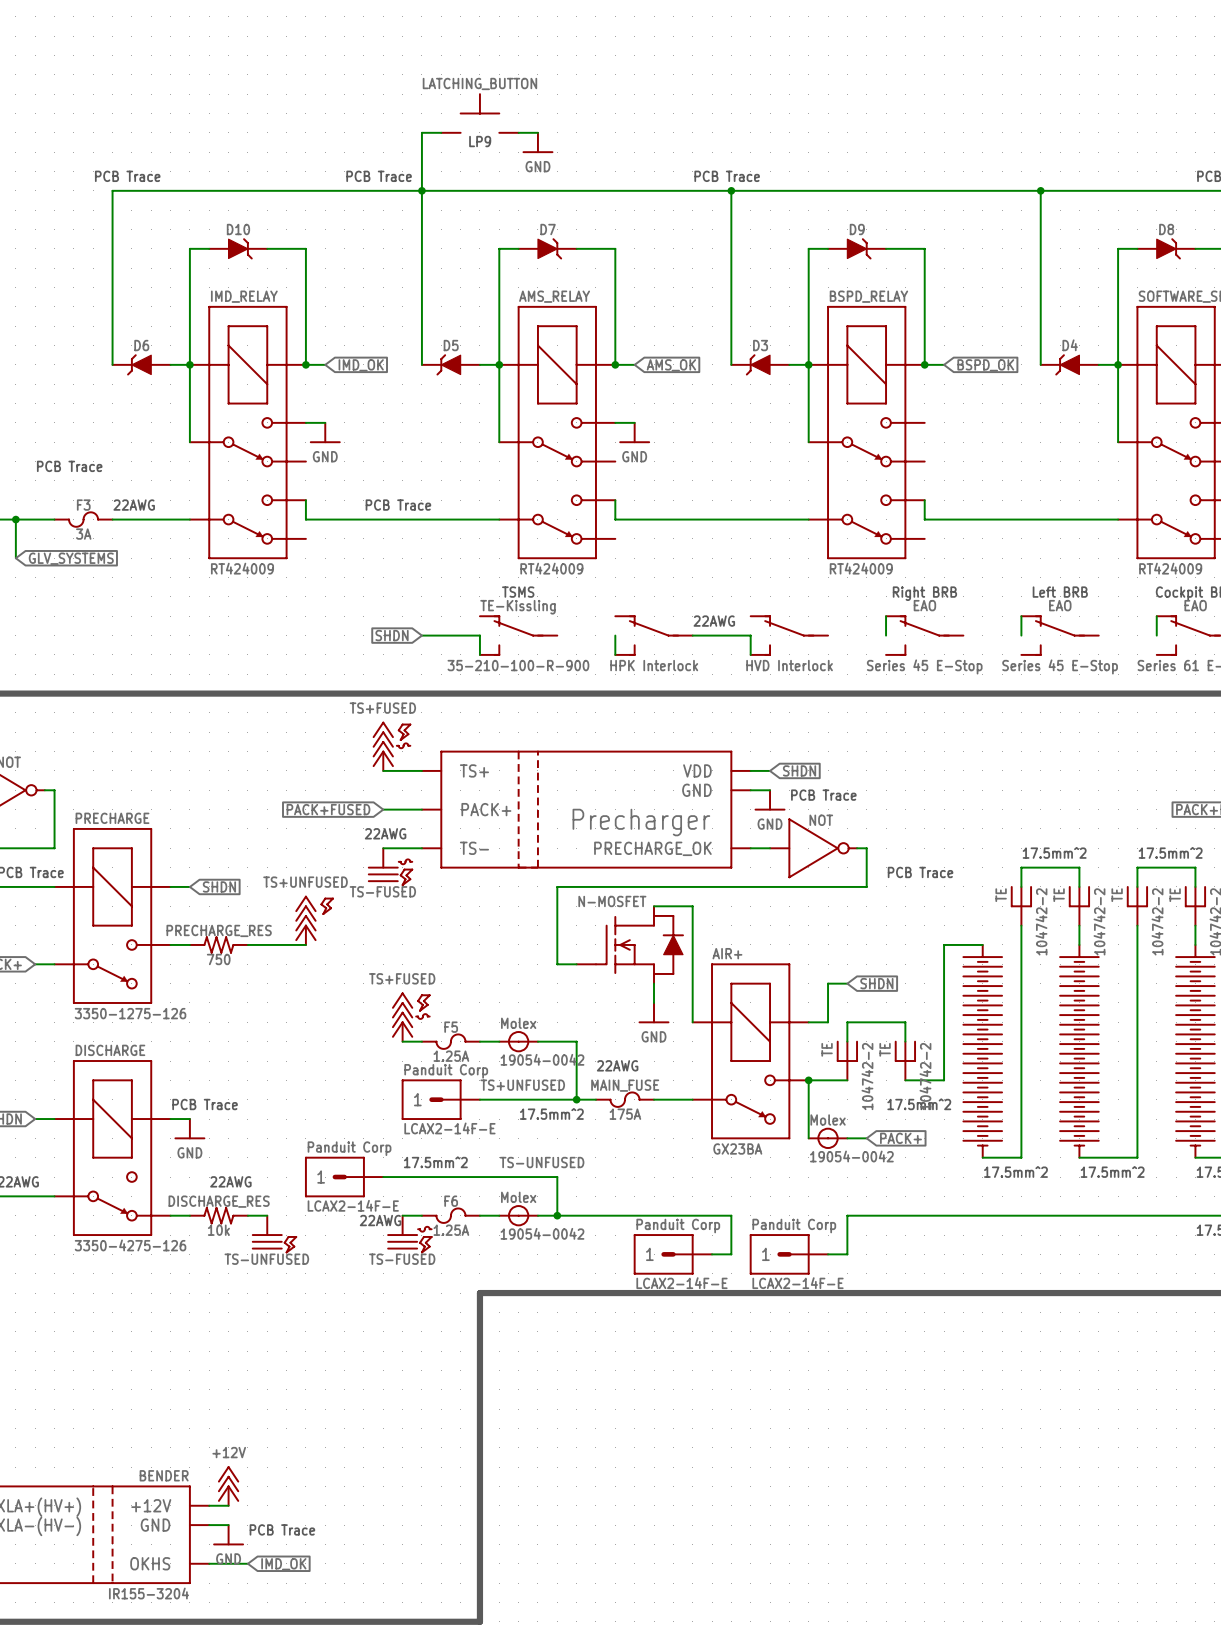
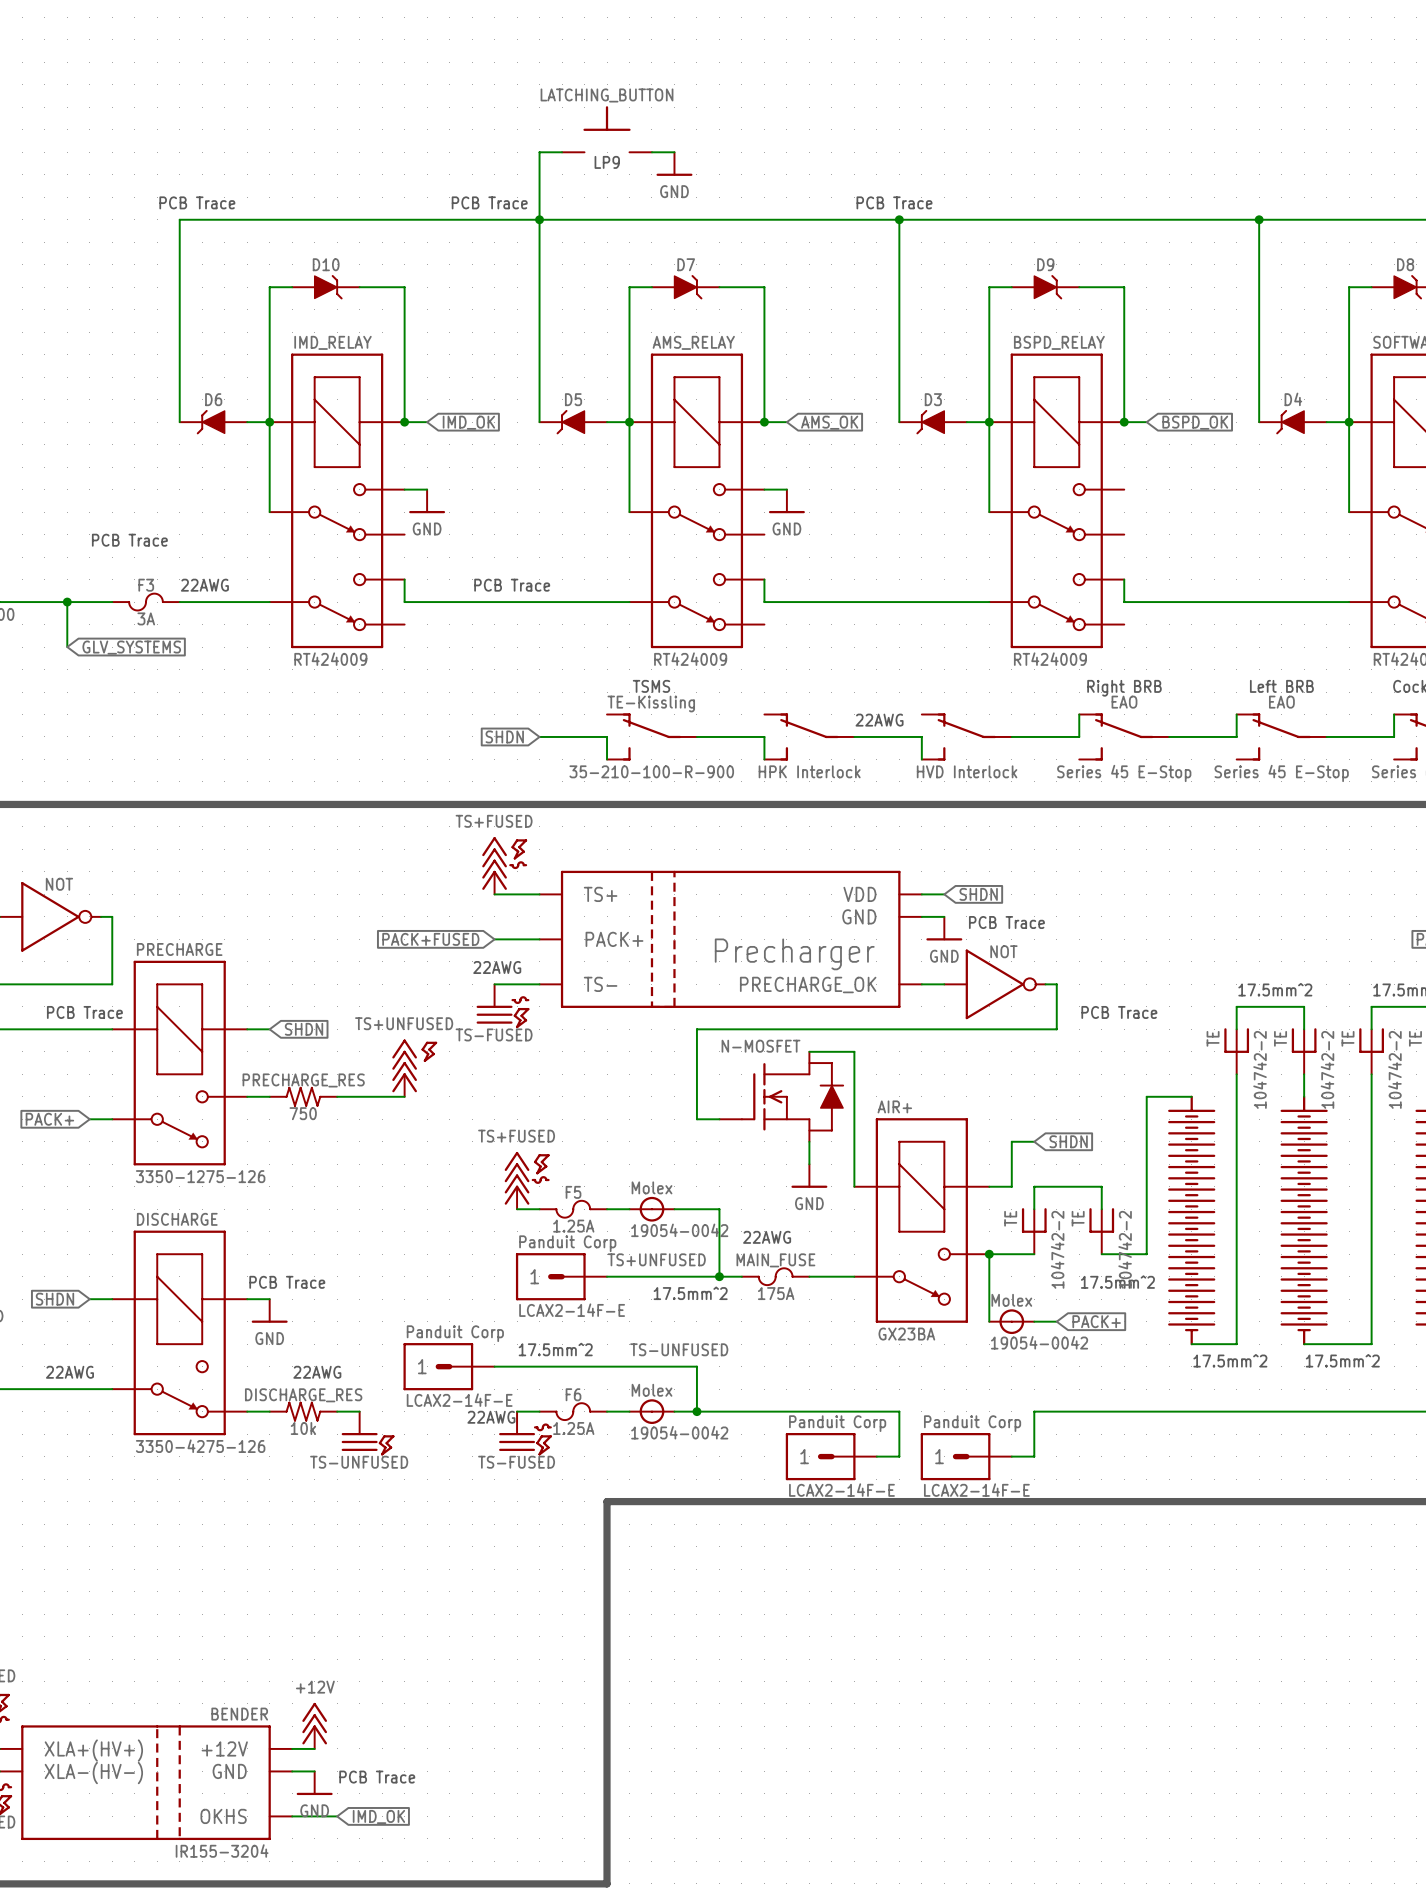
wire: none -> (696, 736) (764, 736)
wire: none -> (1011, 736) (1079, 736)
wire: none -> (1169, 736) (1236, 736)
wire: none -> (1326, 736) (1394, 736)

